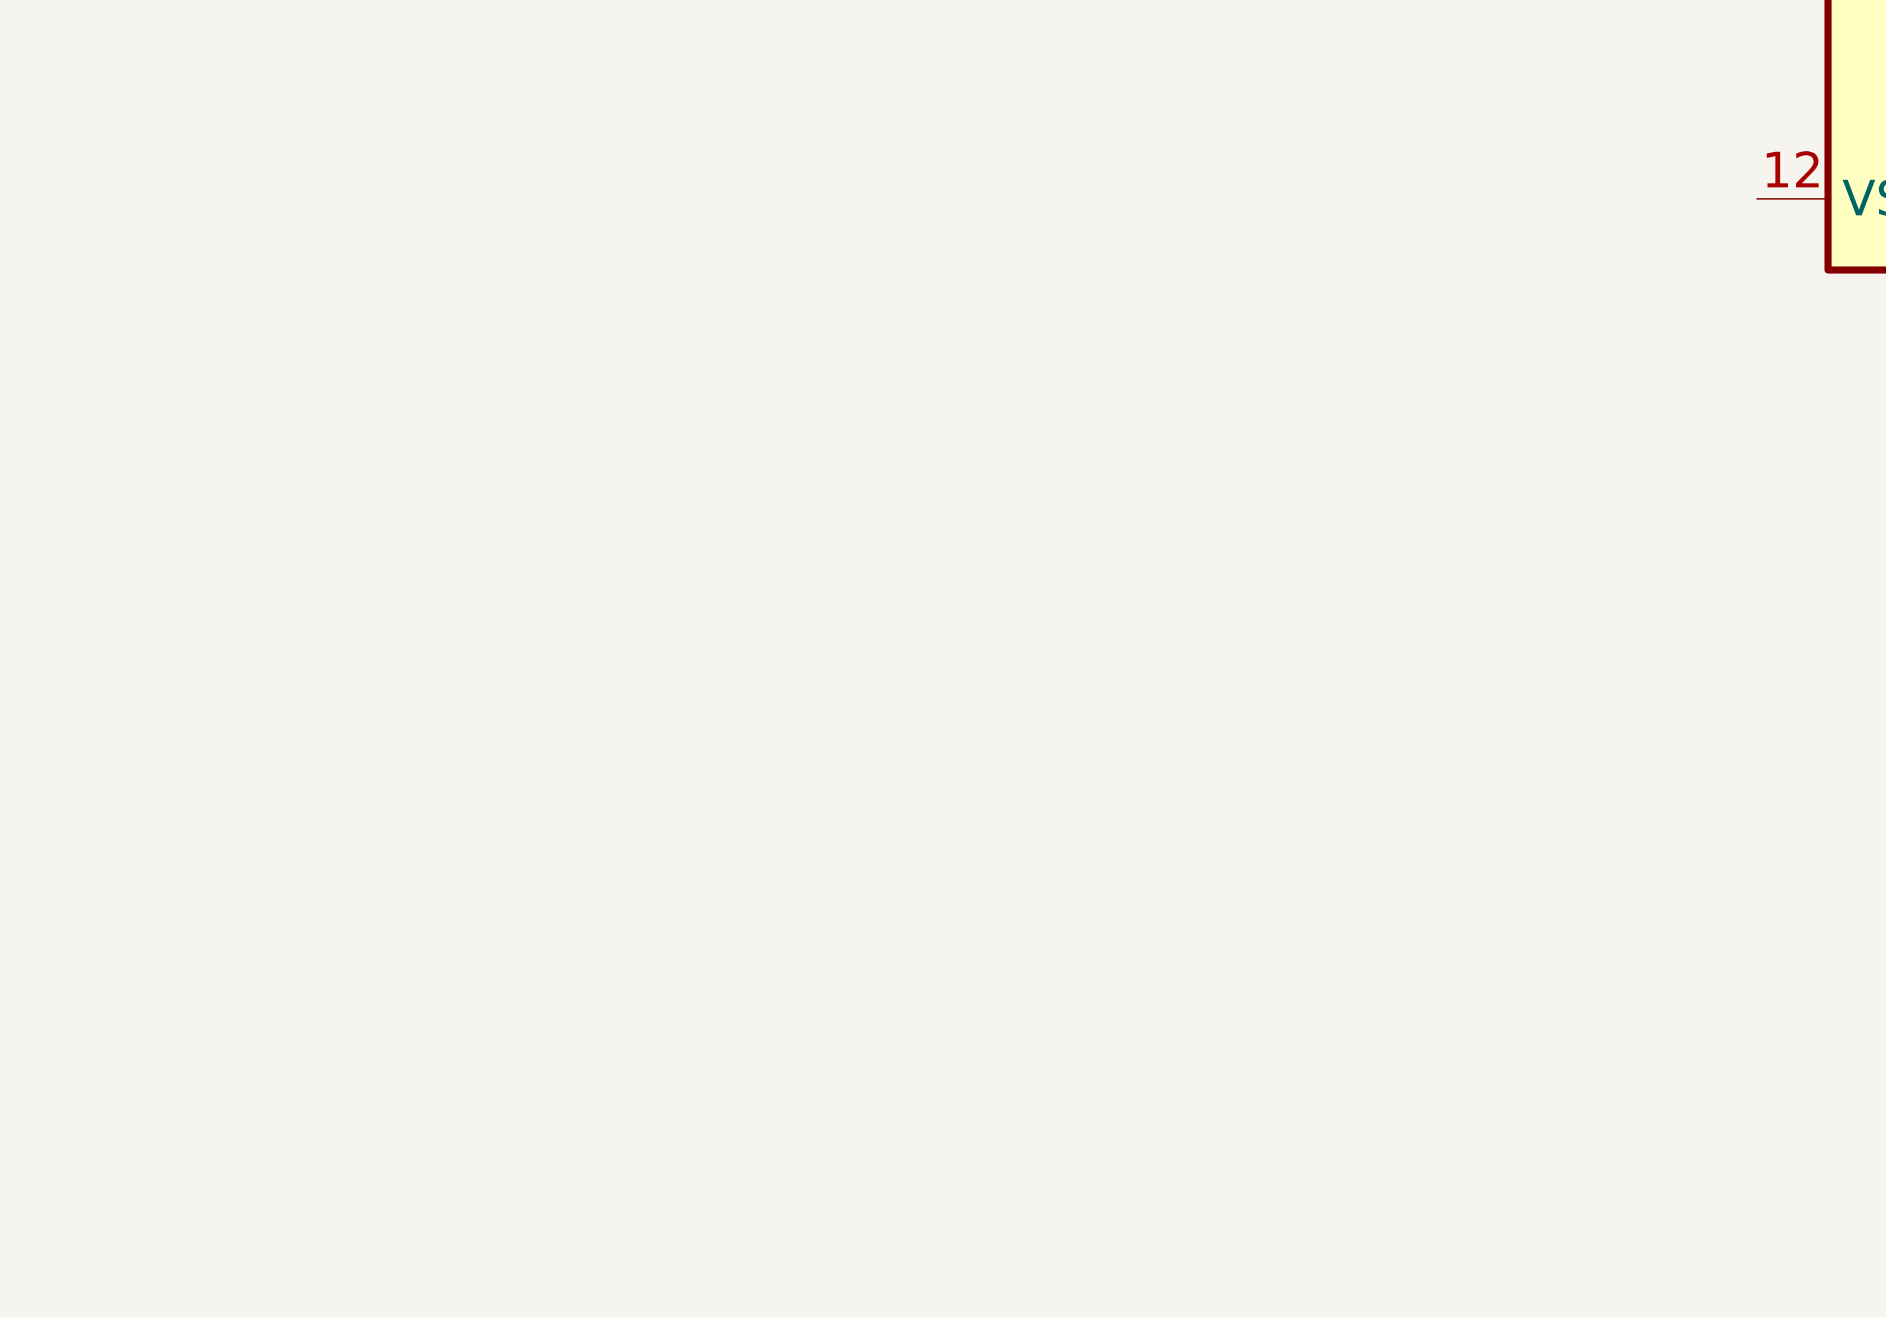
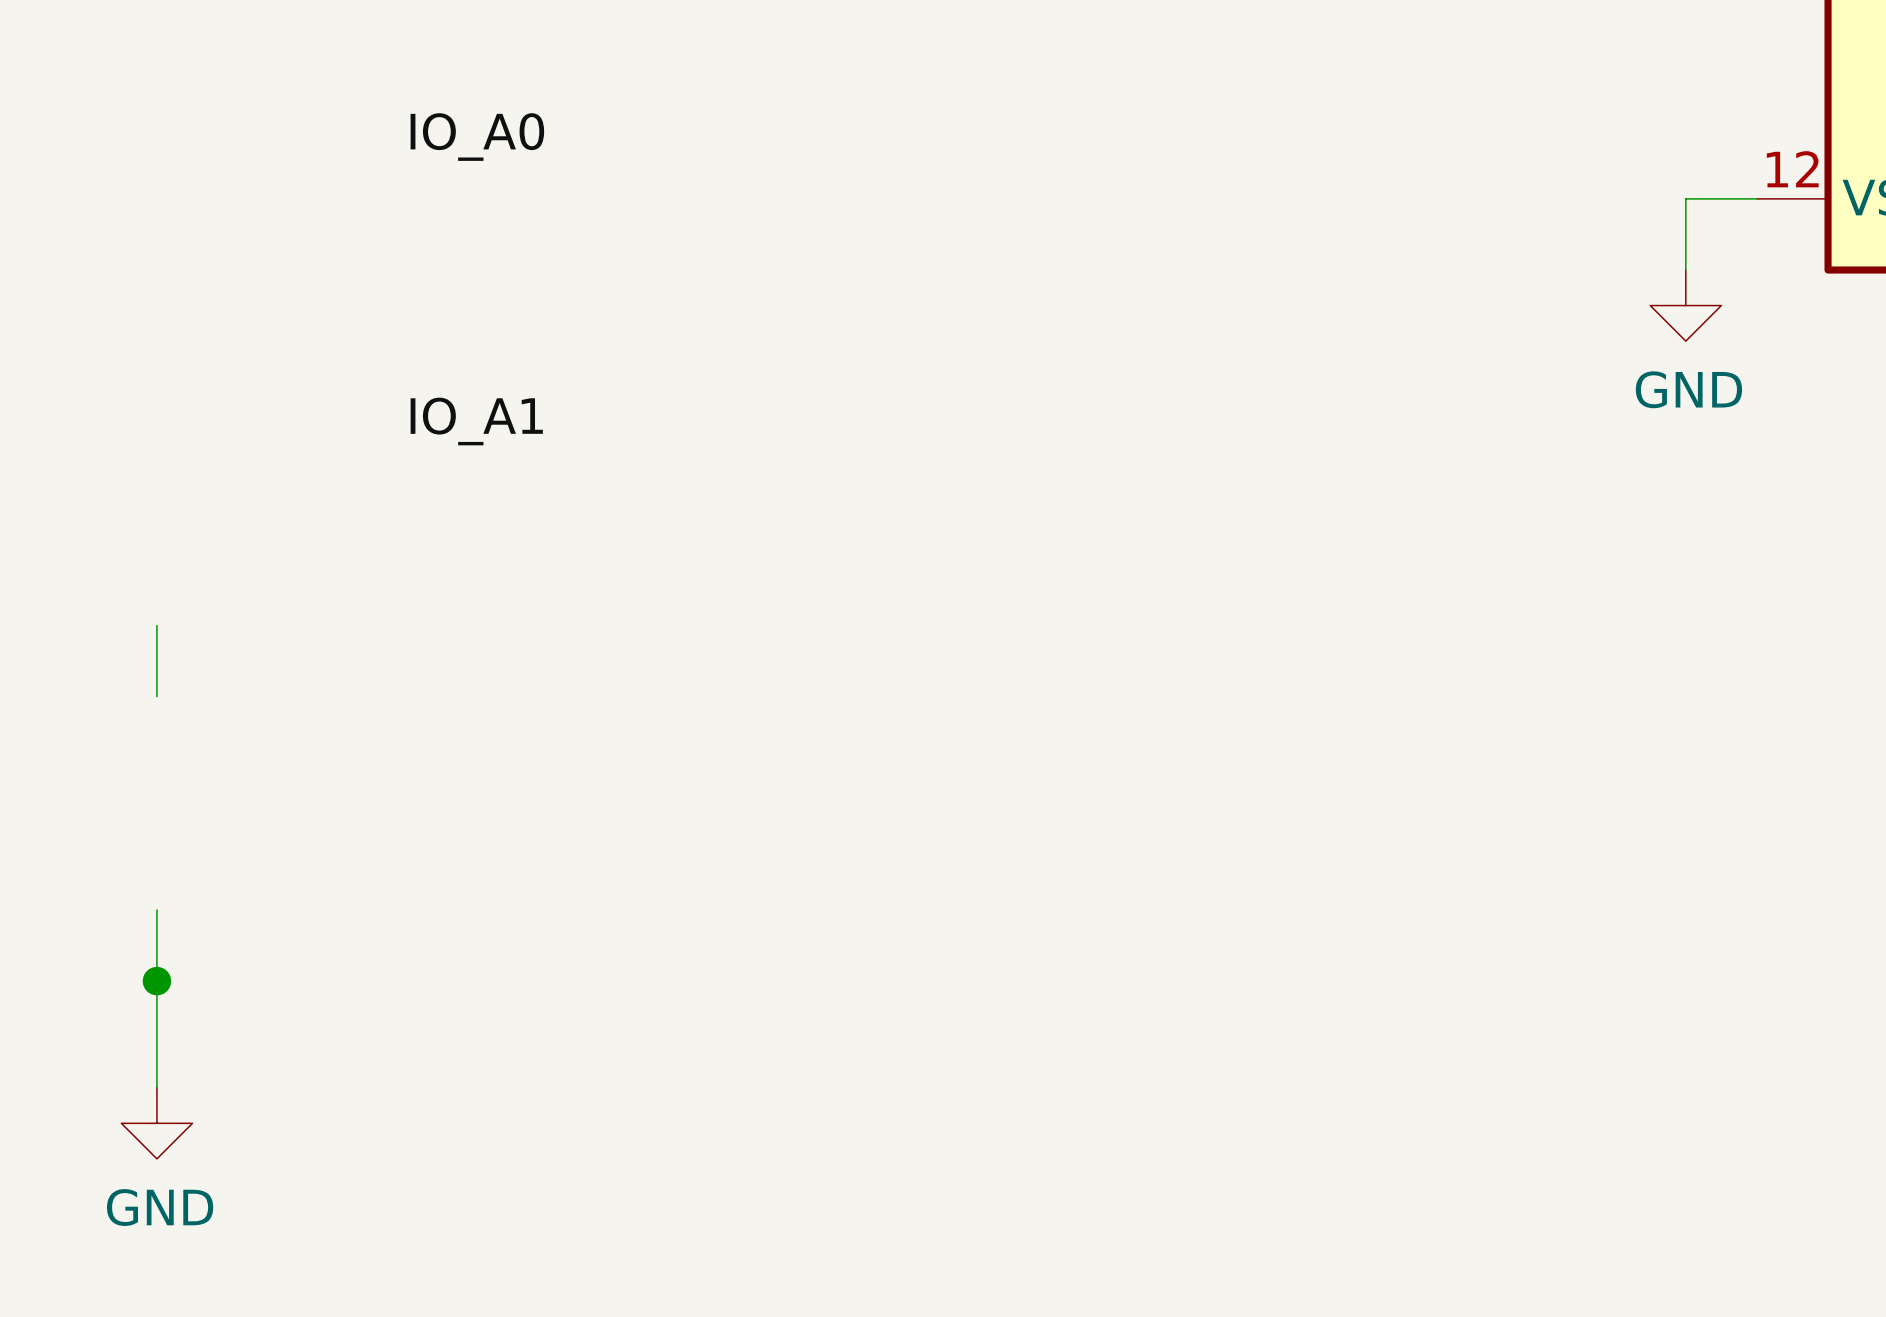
label: none -> IO_A0 (477, 137)
wire: none -> (1756, 198) (1685, 198) (1685, 270)
power symbol: none -> GND (1685, 305)
label: none -> IO_A1 (476, 421)
wire: none -> (156, 625) (156, 696)
wire: none -> (156, 910) (156, 1087)
junction: none -> (156, 981)
power symbol: none -> GND (156, 1123)

